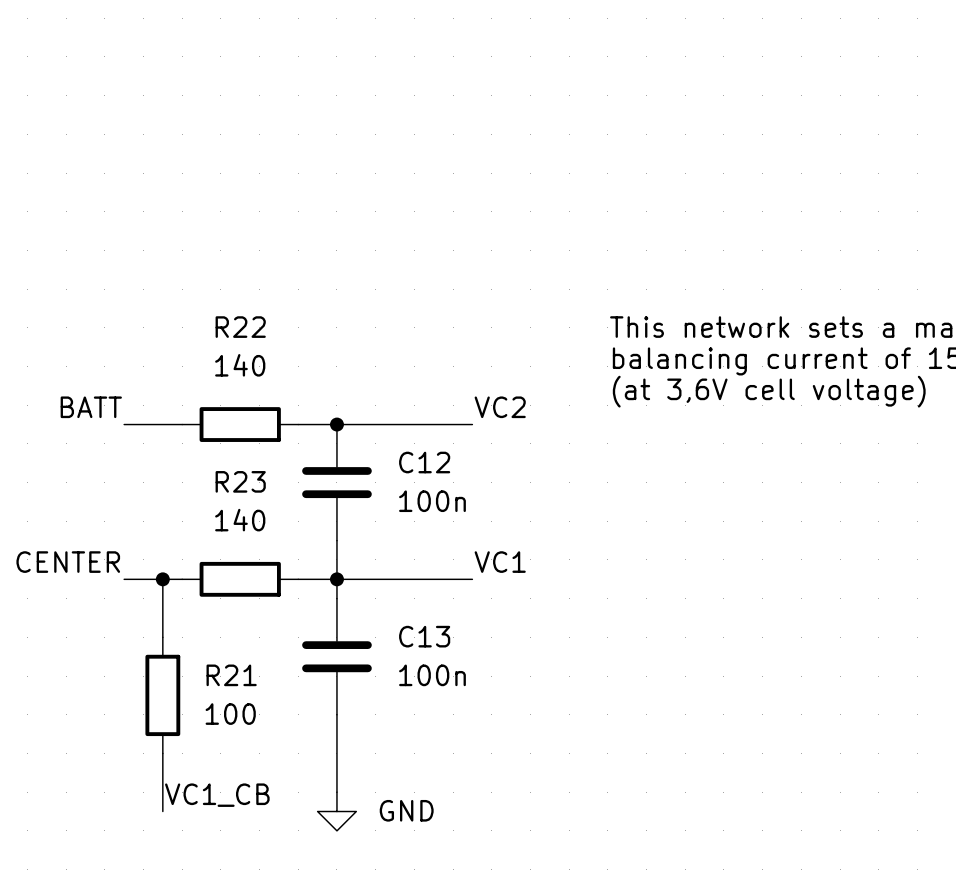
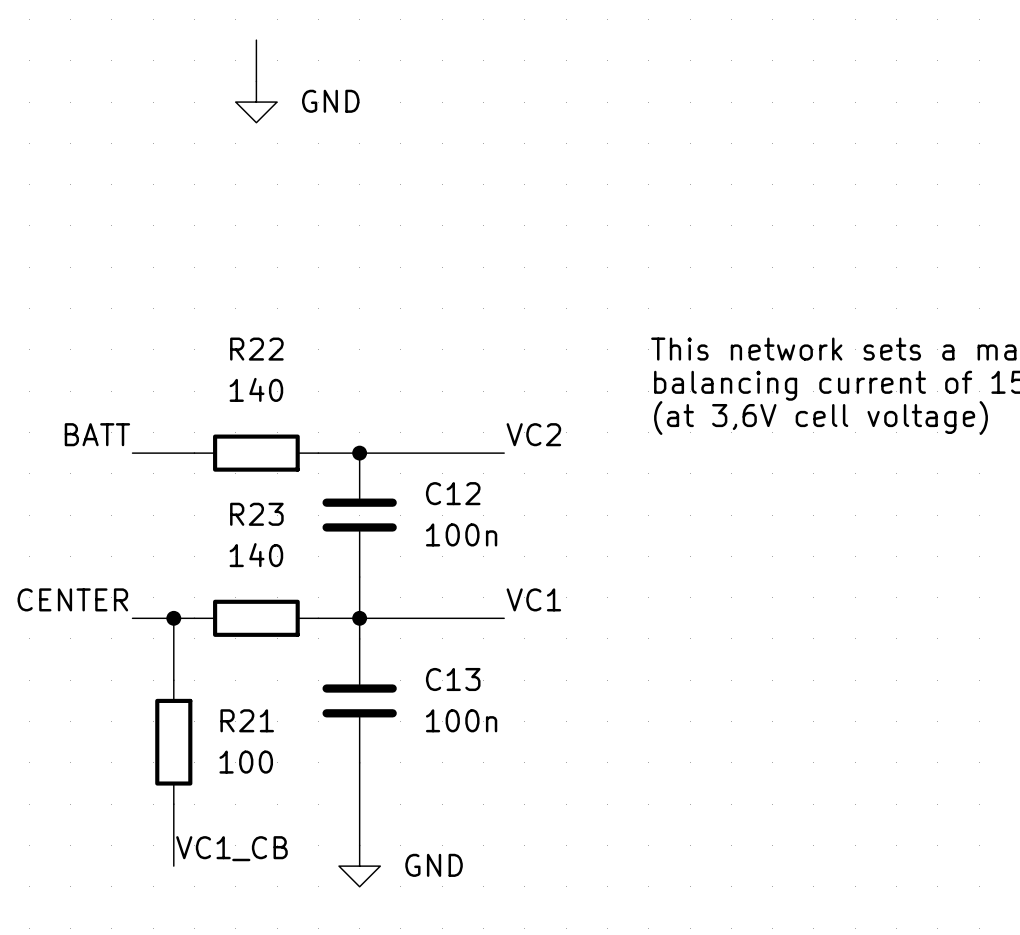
wire: none -> (256, 40) (256, 81)
power symbol: none -> GND (256, 102)

